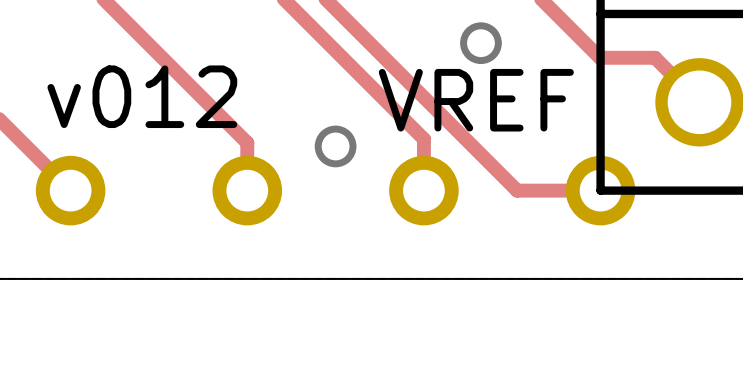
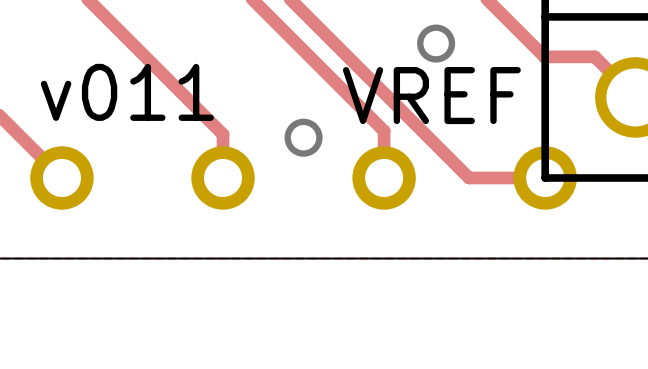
text: v012 (142, 96) -> v011 (127, 92)

